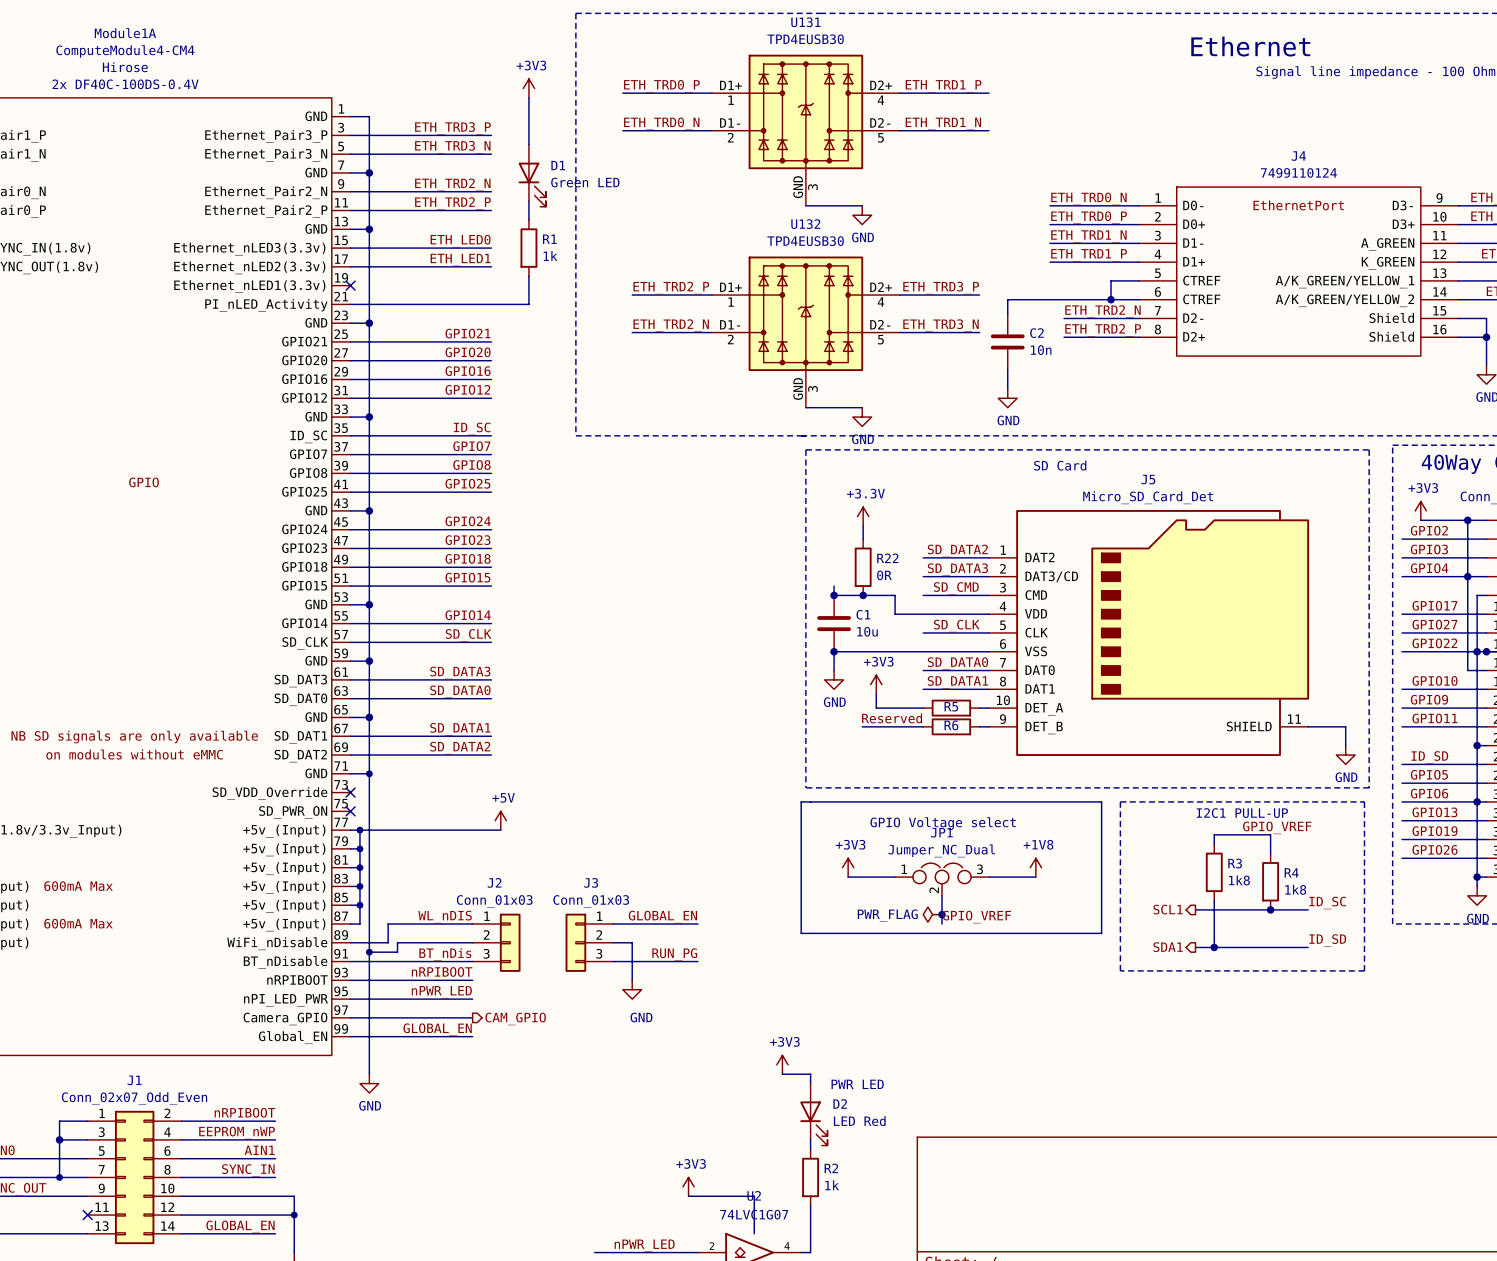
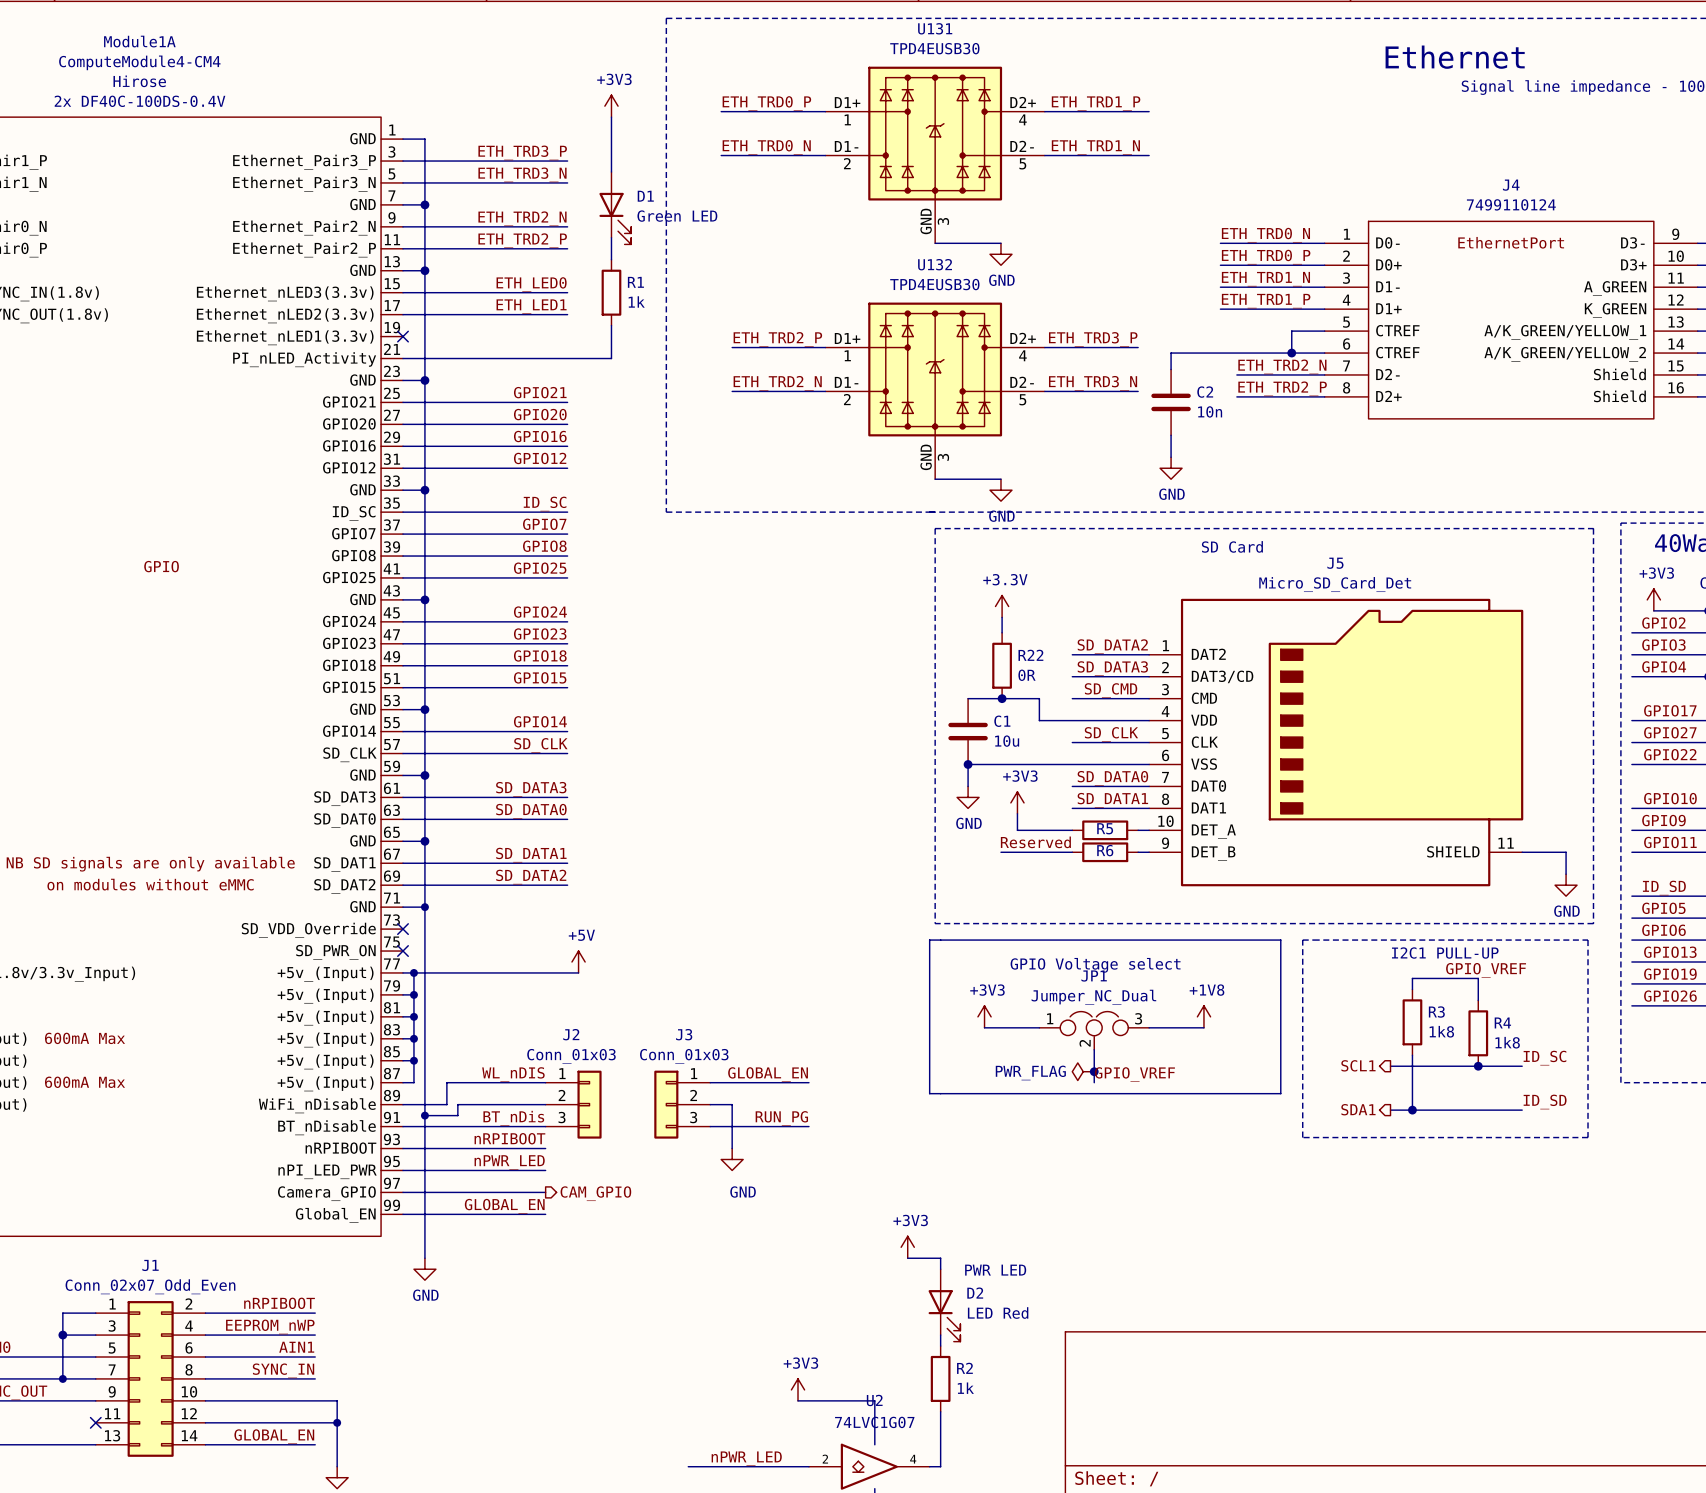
wire: (834, 586) (834, 595) -> none
junction: (834, 595) -> none

